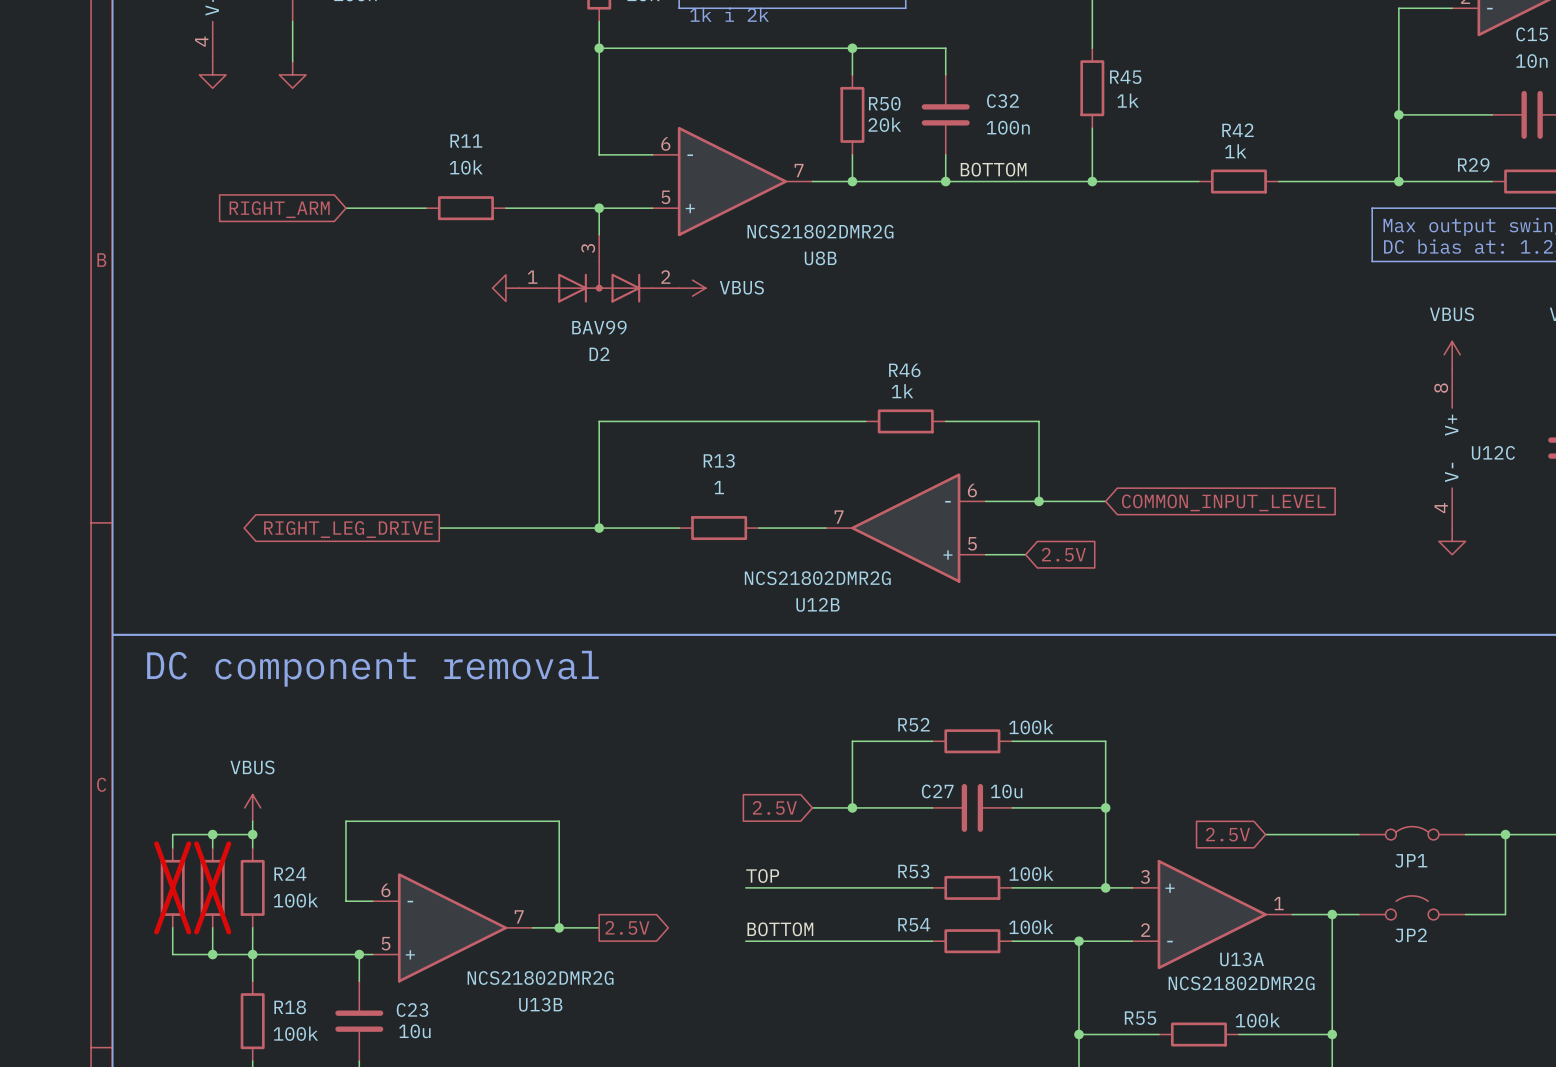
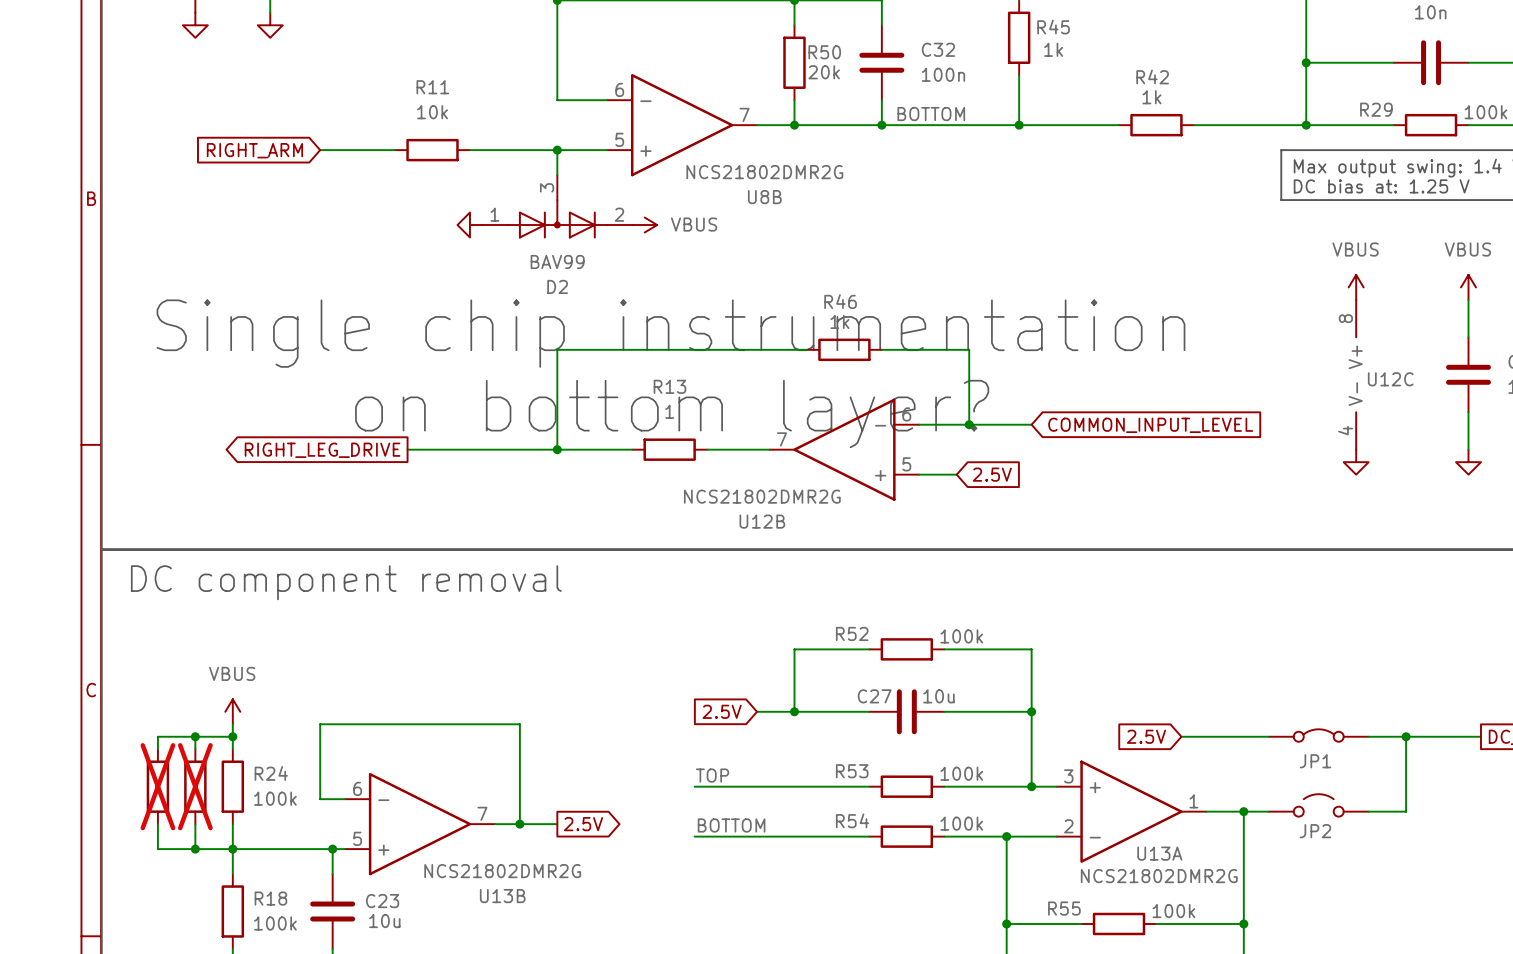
text: none -> Single chip instrumentation (670, 333)
text: none -> on bottom layer? (672, 413)

